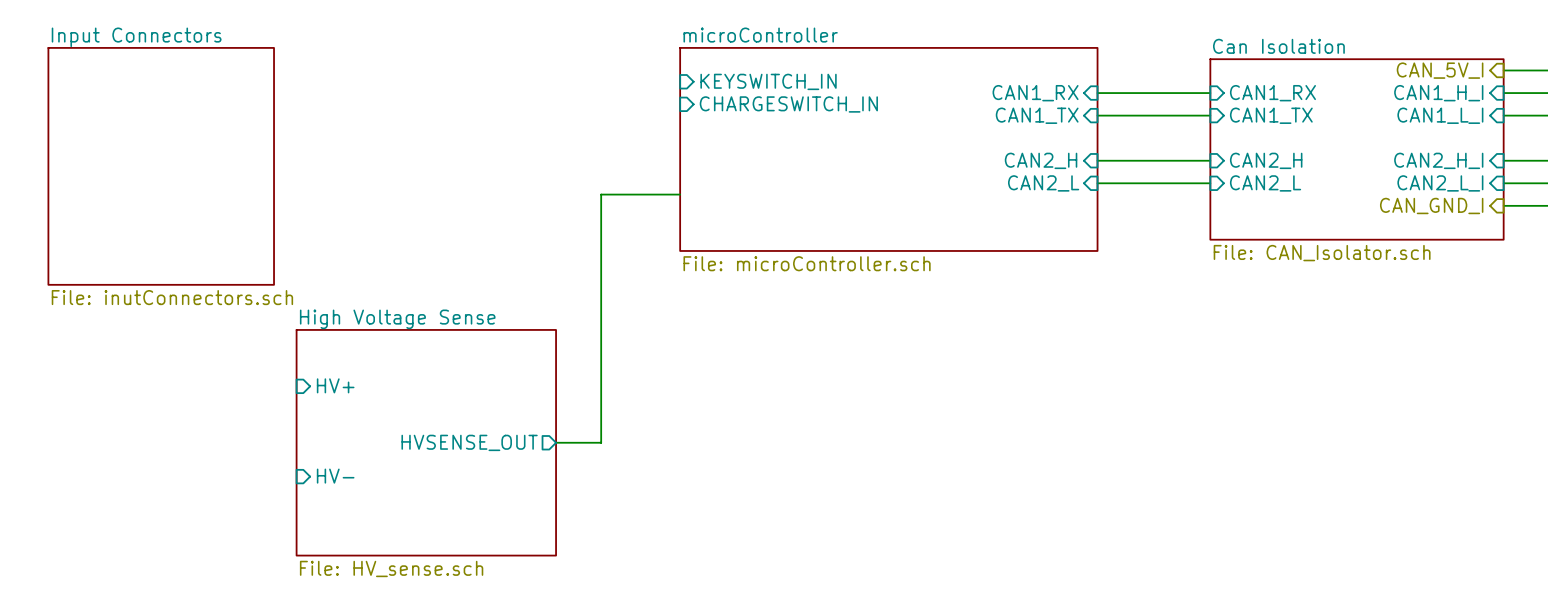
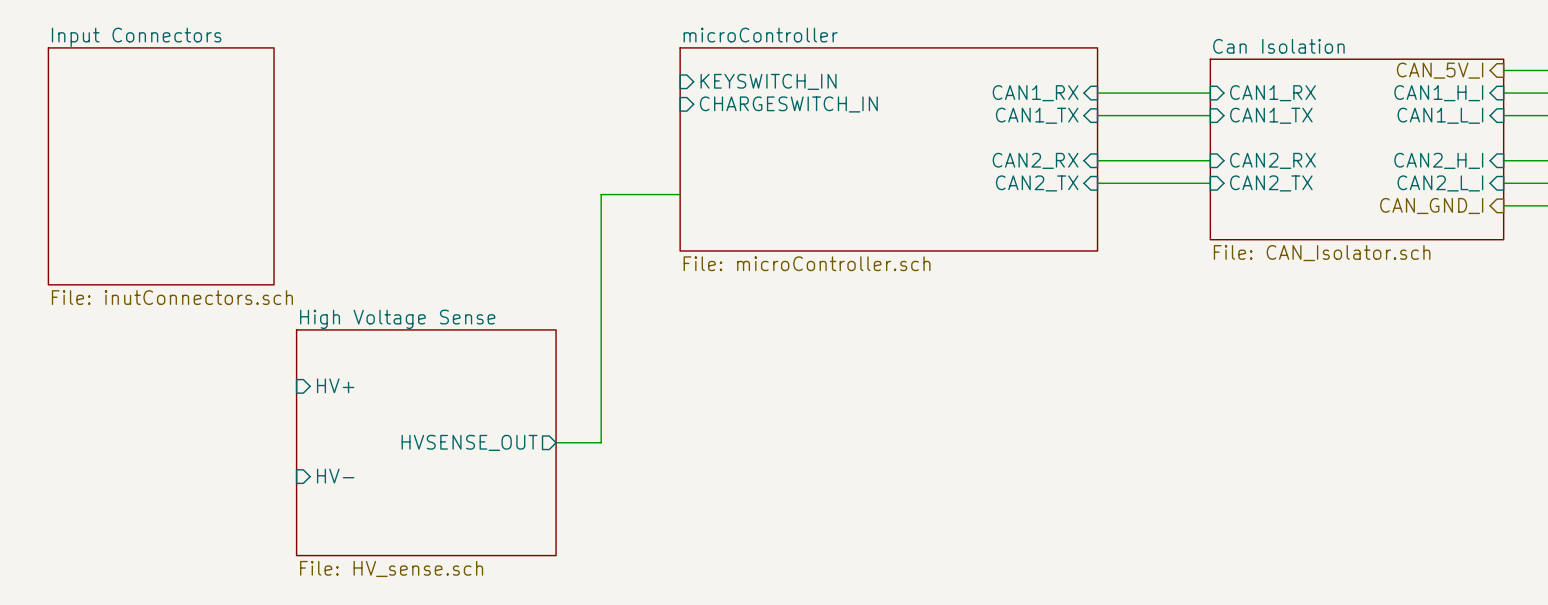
sheet pin: CAN2_H (1041, 160) -> CAN2_RX (1035, 160)
sheet pin: CAN2_H (1266, 160) -> CAN2_RX (1272, 160)
sheet pin: CAN2_L (1043, 183) -> CAN2_TX (1037, 183)
sheet pin: CAN2_L (1265, 183) -> CAN2_TX (1271, 183)

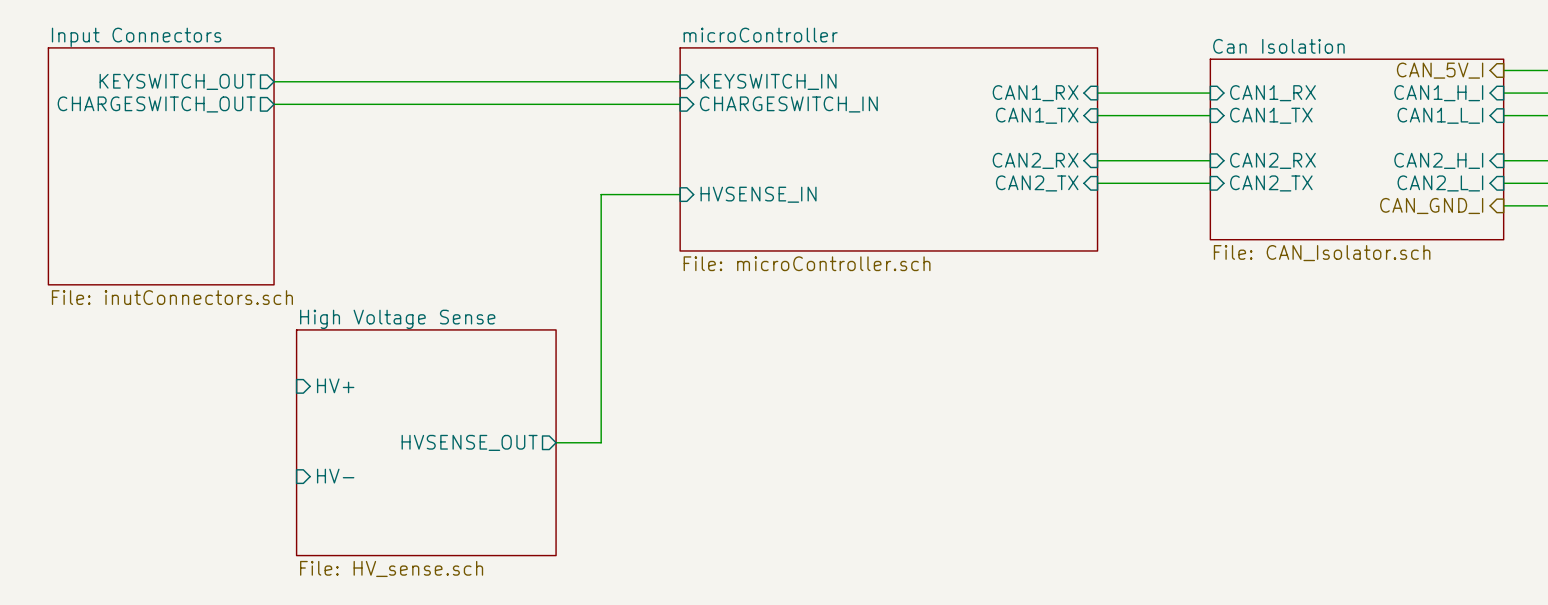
sheet pin: none -> KEYSWITCH_OUT (177, 81)
wire: none -> (274, 81) (680, 81)
sheet pin: none -> CHARGESWITCH_OUT (156, 104)
wire: none -> (274, 104) (680, 104)
sheet pin: none -> HVSENSE_IN (758, 194)

